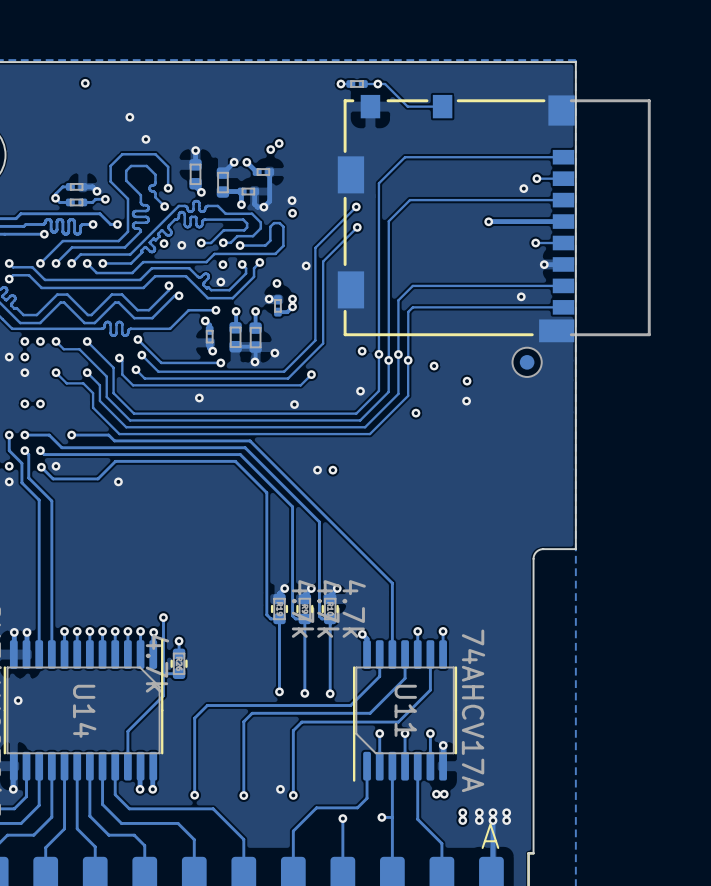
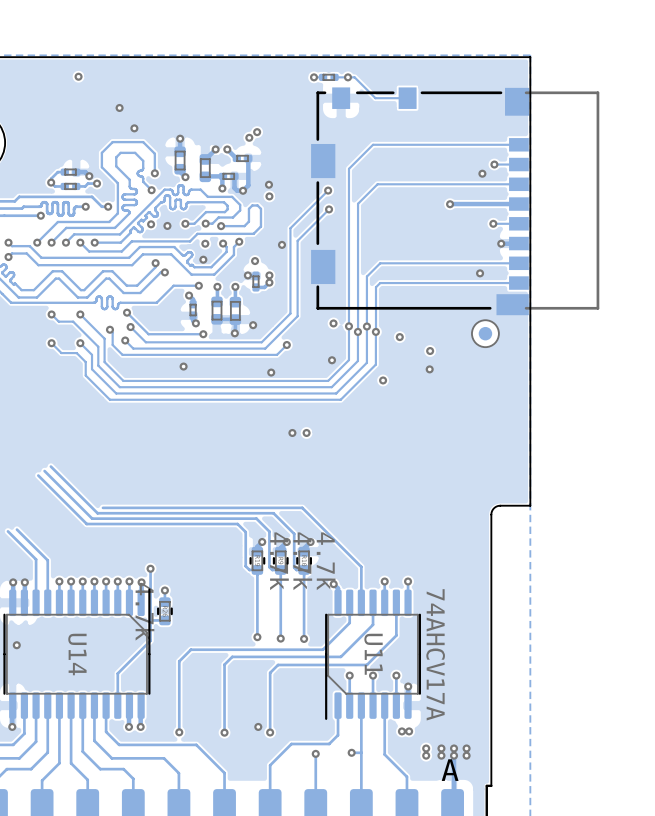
via: (24, 341) -> none
via: (40, 341) -> none
via: (9, 357) -> none
via: (24, 357) -> none
via: (24, 372) -> none
via: (24, 403) -> none
via: (40, 403) -> none
track: (9, 435) (9, 450) (21, 463) (21, 482) (39, 500) (39, 607) -> (7, 531) (36, 559)
via: (9, 435) -> none
track: (24, 435) (49, 435) (61, 447) (245, 447) (319, 522) (319, 579) -> (50, 466) (97, 513) (273, 513) (294, 533)
via: (24, 435) -> none
track: (71, 435) (108, 435) (114, 440) (250, 440) (392, 583) (392, 615) -> (102, 507) (302, 507) (361, 566)
via: (71, 435) -> none
track: (24, 450) (28, 454) (28, 477) (51, 501) (51, 608) -> (16, 529) (47, 560)
via: (24, 450) -> none
track: (40, 450) (44, 454) (240, 454) (292, 506) (292, 577) -> (44, 471) (92, 518) (256, 518) (269, 531)
via: (40, 450) -> none
via: (9, 466) -> none
via: (56, 466) -> none
track: (41, 467) (53, 478) (97, 478) (115, 461) (235, 461) (266, 492) (266, 577) -> (38, 475) (86, 524) (237, 524) (245, 532)
via: (41, 467) -> none
via: (9, 481) -> none
via: (118, 481) -> none

